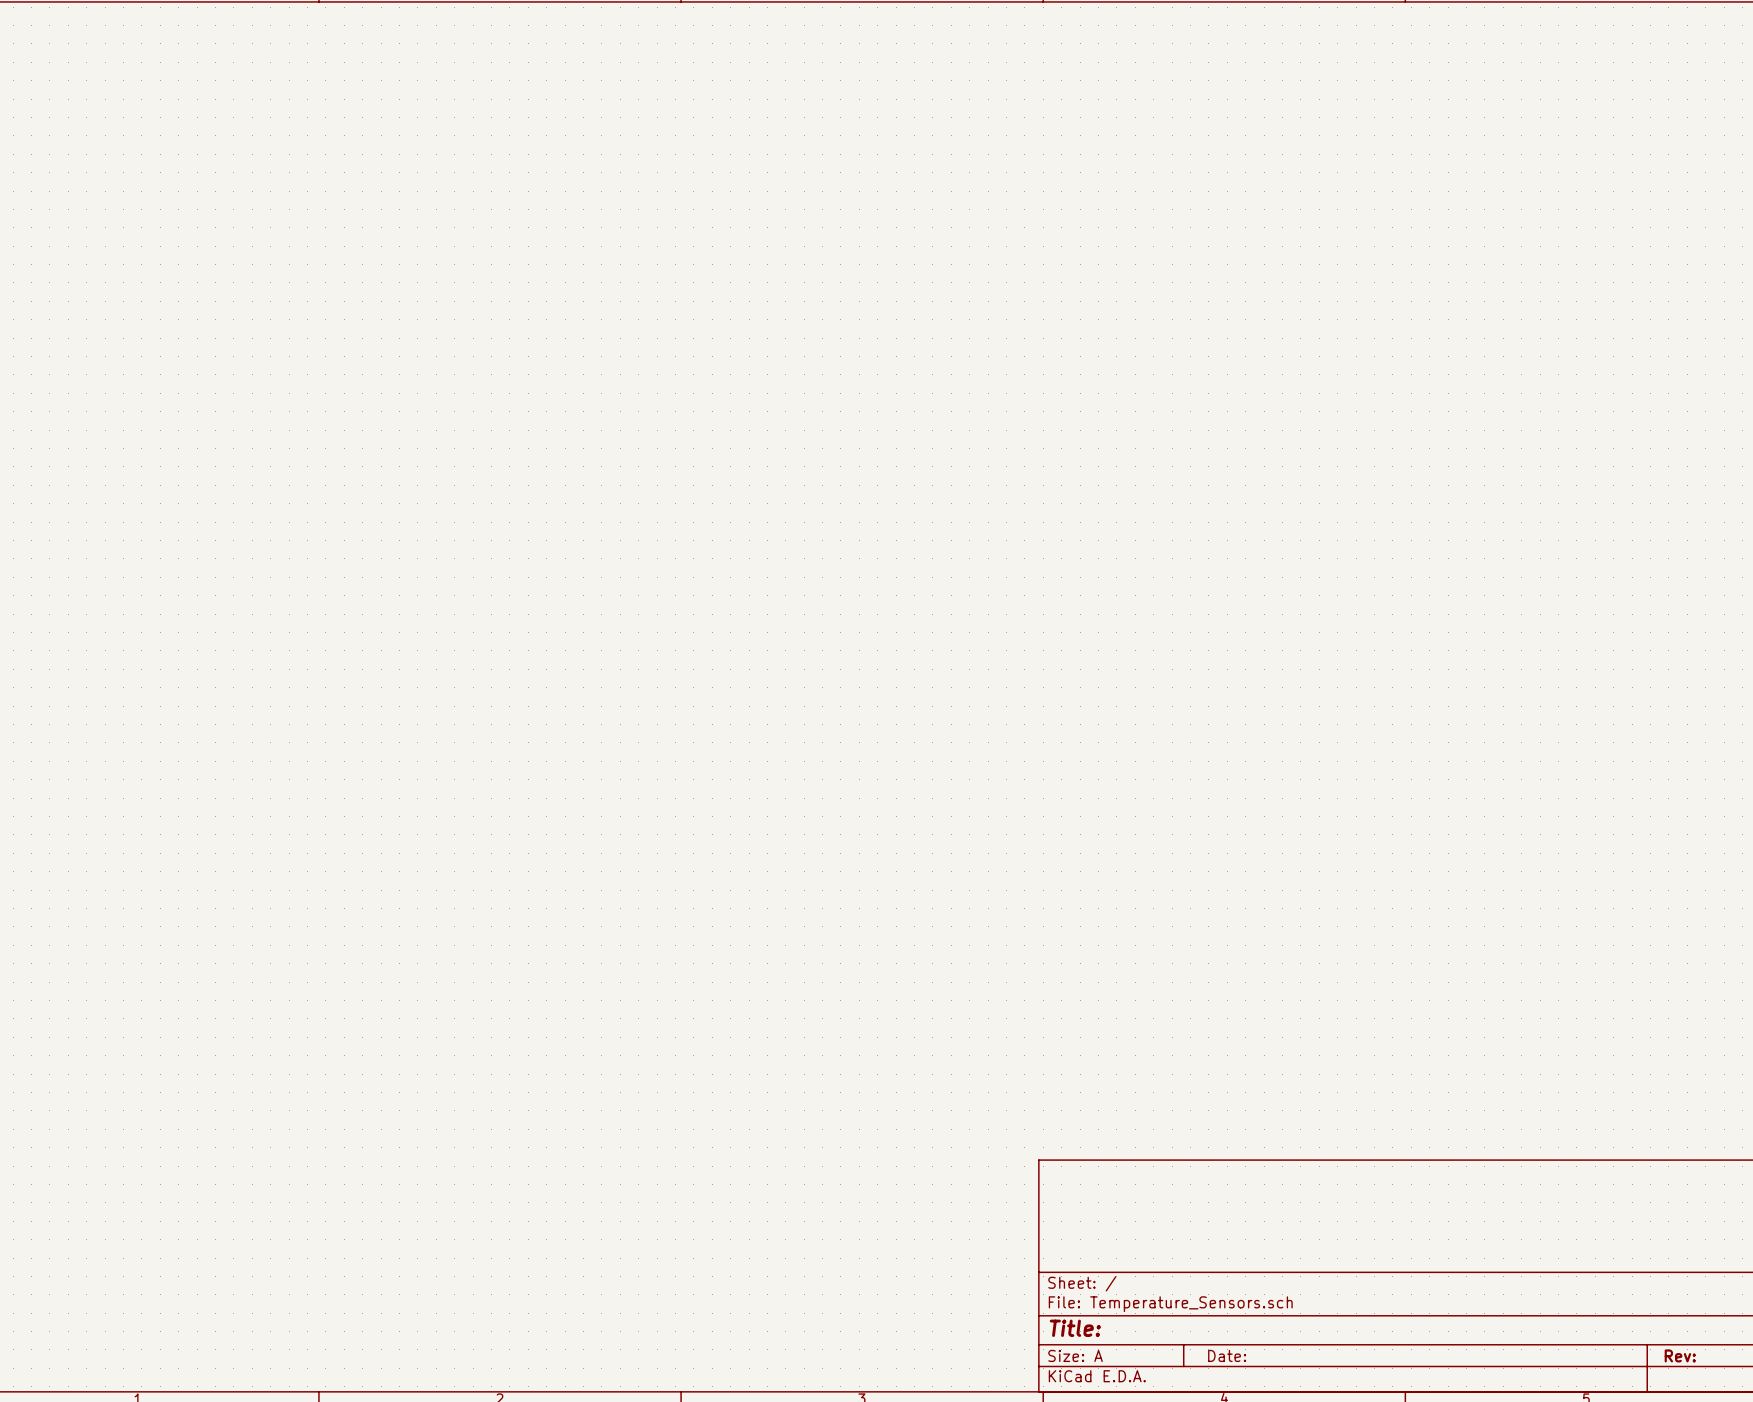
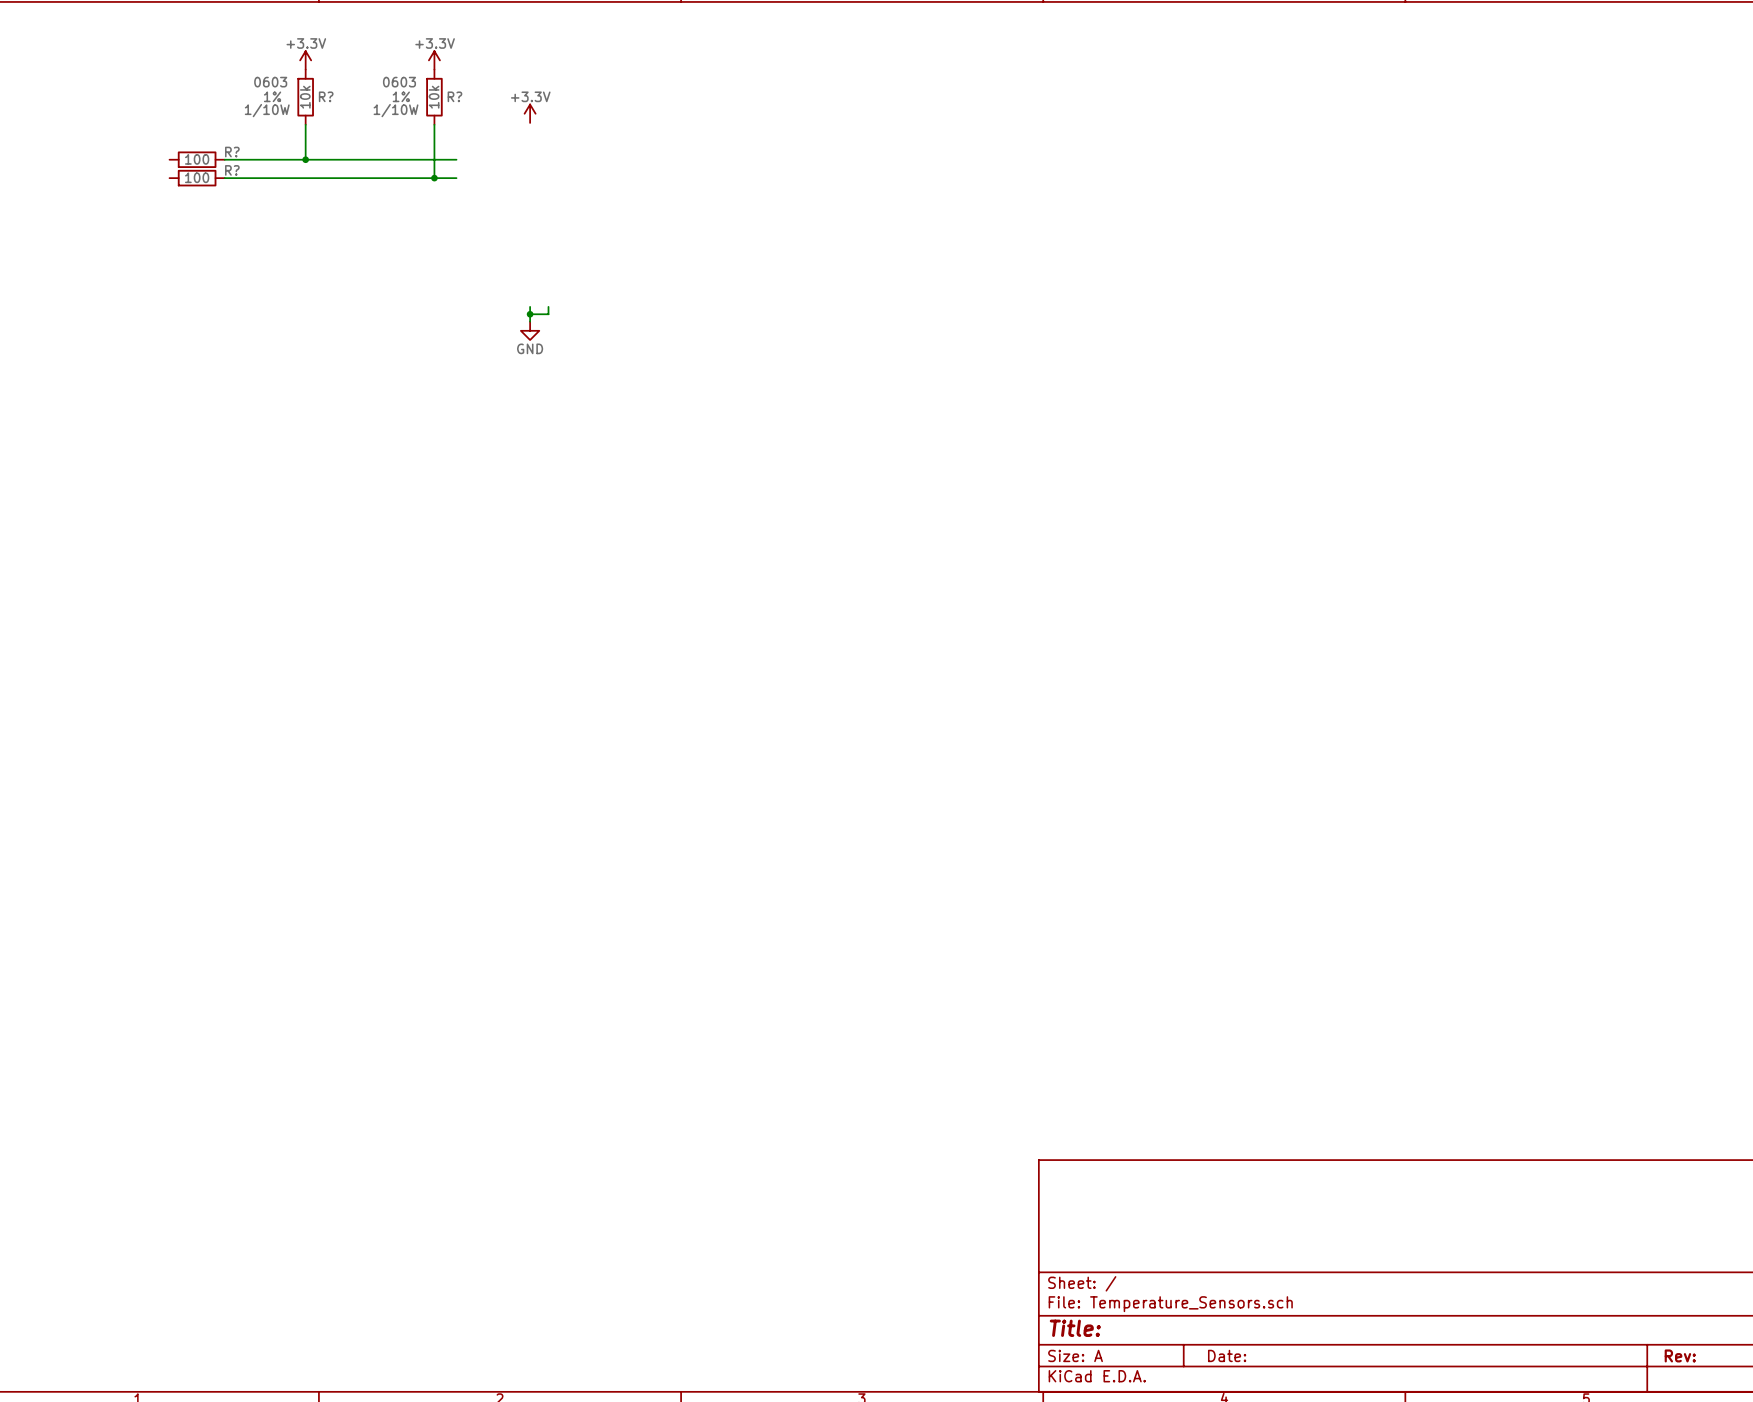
power symbol: none -> +3.3V (305, 60)
power symbol: none -> +3.3V (434, 60)
R?: none -> 10k (305, 97)
R?: none -> 10k (434, 97)
power symbol: none -> +3.3V (530, 113)
wire: none -> (305, 124) (305, 159)
wire: none -> (434, 124) (434, 178)
R?: none -> 100 (197, 159)
wire: none -> (224, 159) (456, 159)
junction: none -> (305, 159)
R?: none -> 100 (197, 178)
wire: none -> (224, 178) (456, 178)
junction: none -> (434, 178)
wire: none -> (530, 306) (530, 321)
wire: none -> (548, 306) (548, 314) (530, 314)
junction: none -> (530, 314)
power symbol: none -> GND (530, 330)

